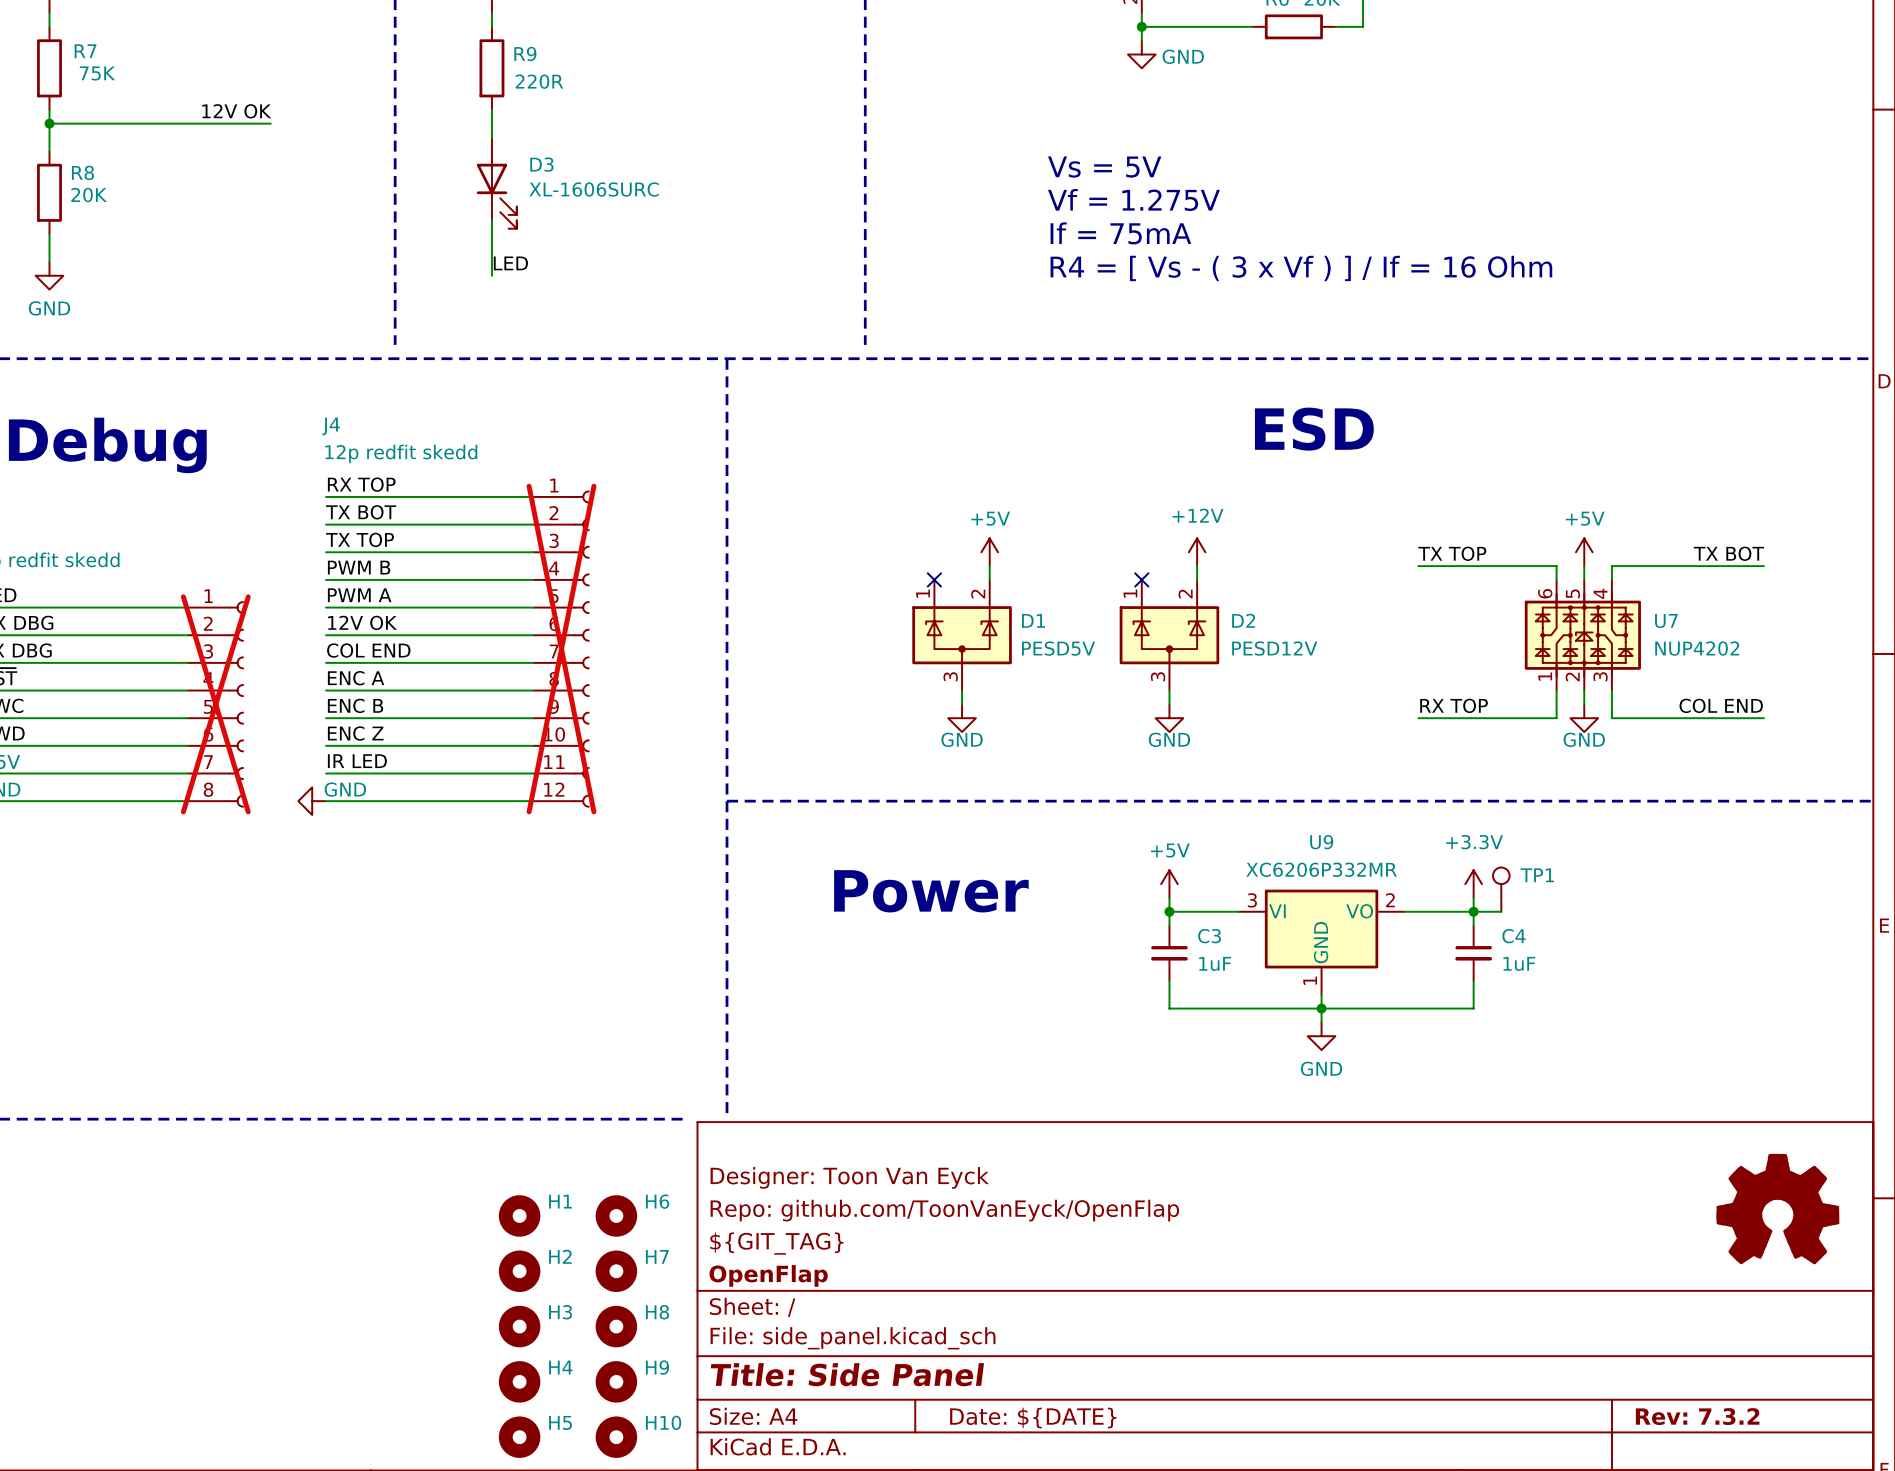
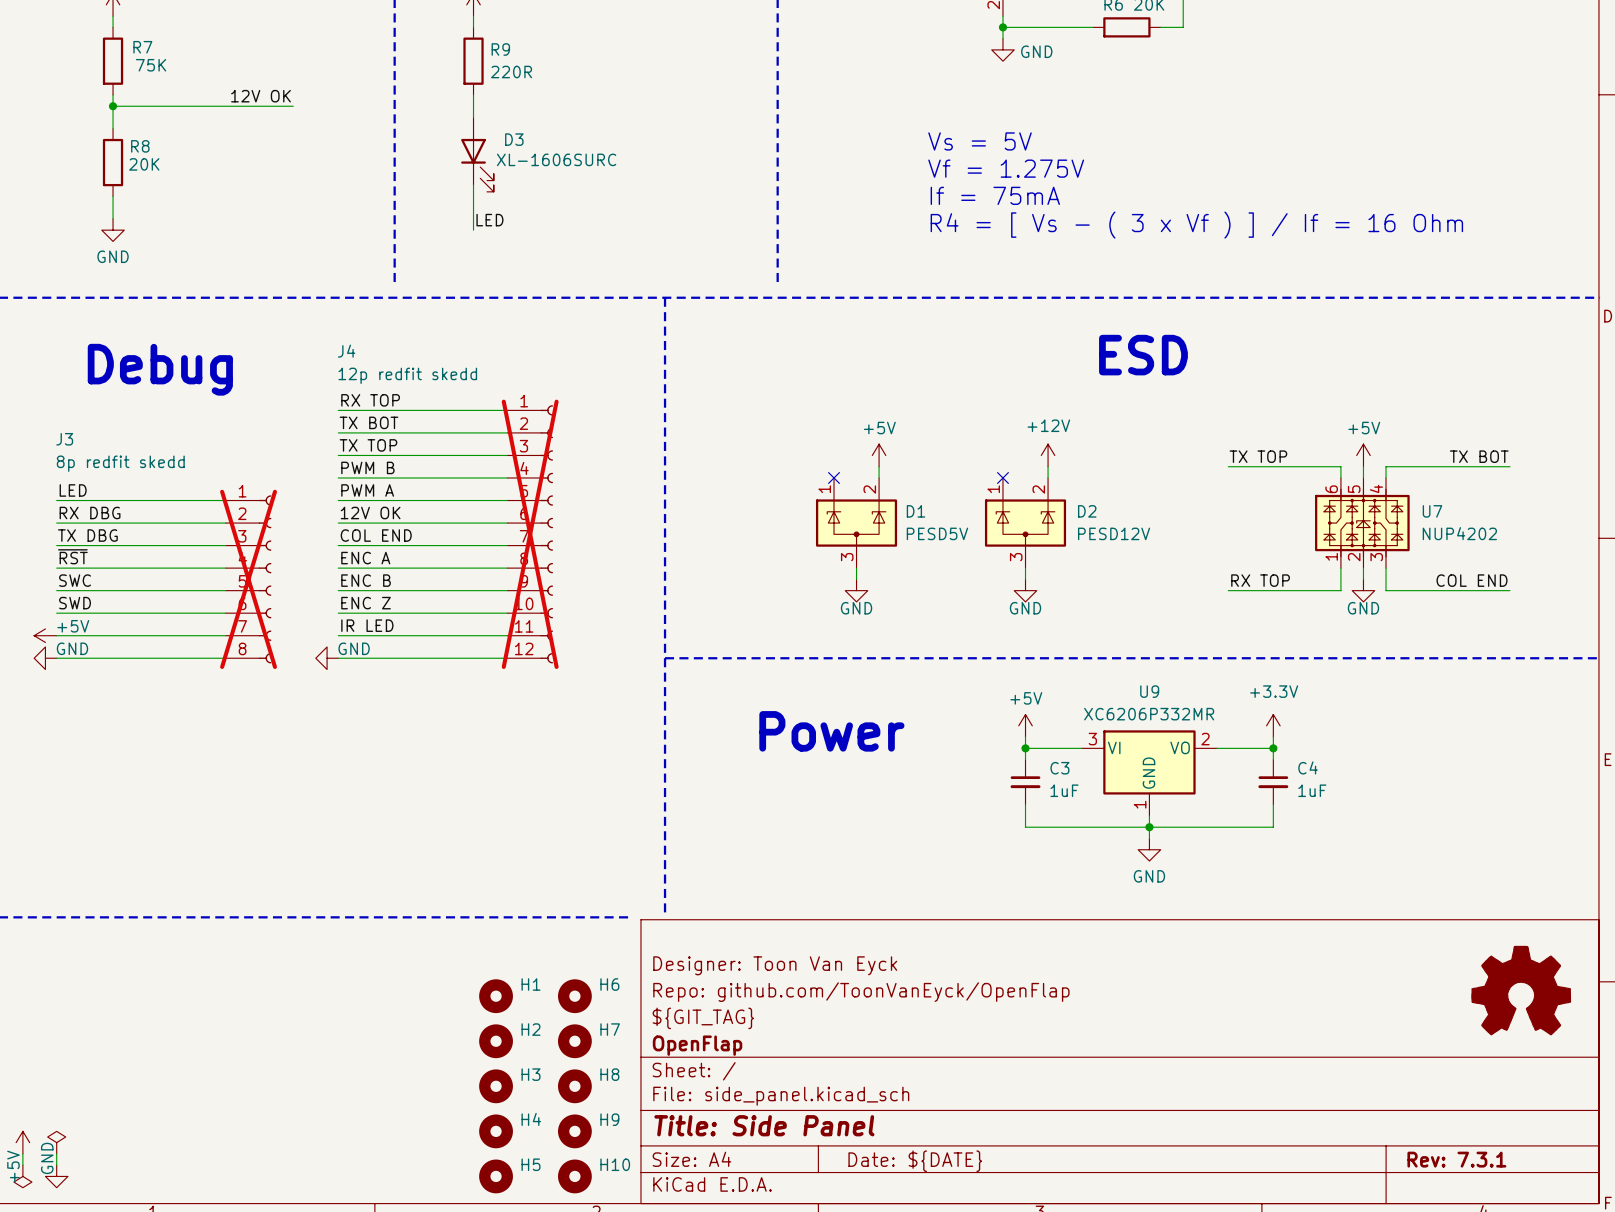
TP1: (1501, 889) -> none
wire: (1473, 911) (1501, 911) -> none
title block: Rev: 7.3.2 (1697, 1416) -> Rev: 7.3.1 (1456, 1159)

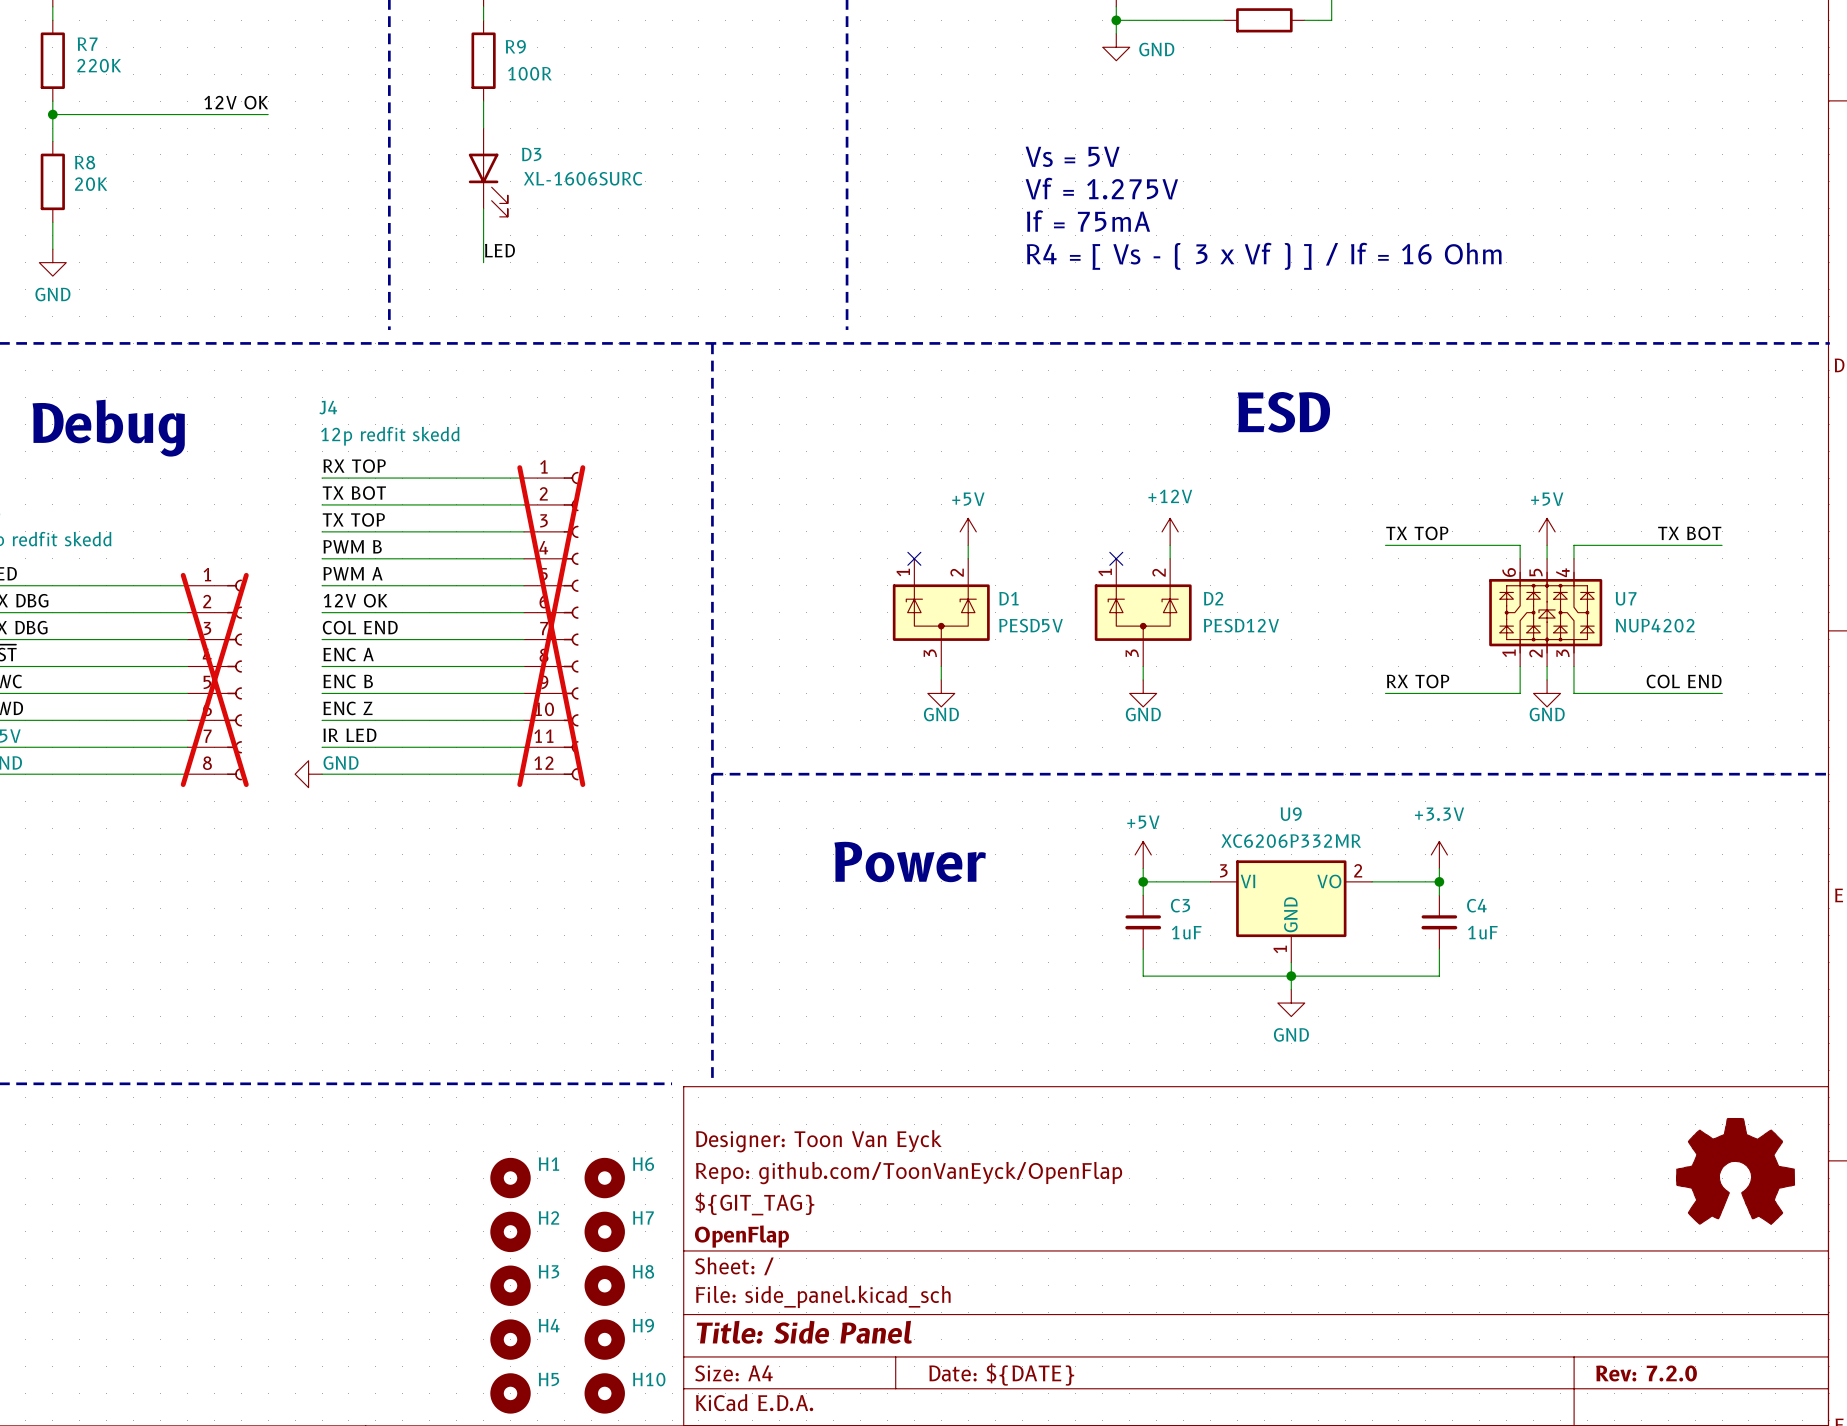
R7 value: 75K (151, 65) -> 220K (99, 65)
R9 value: 220R (511, 72) -> 100R (529, 73)
title block: Rev: 7.3.1 (1456, 1159) -> Rev: 7.2.0 (1646, 1373)

